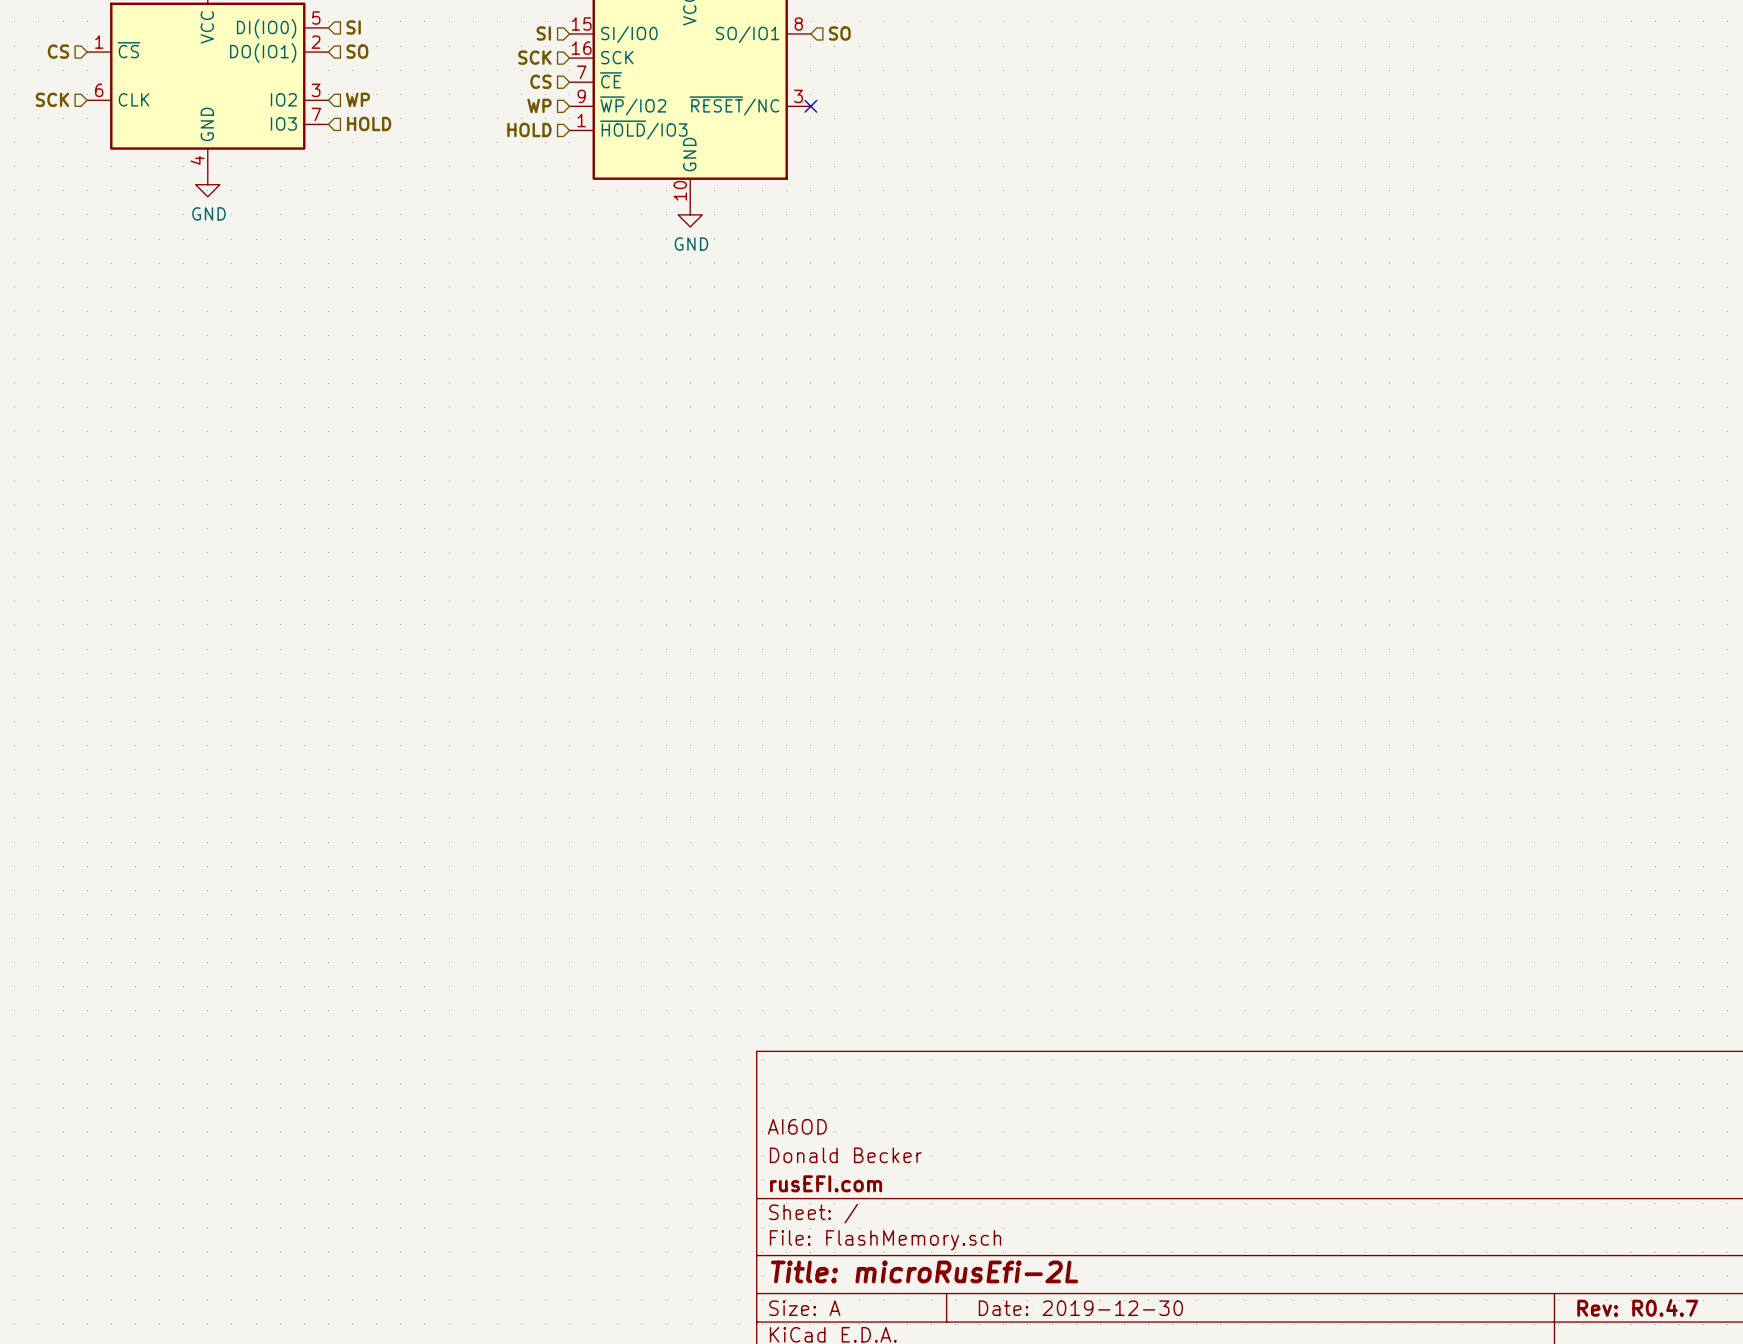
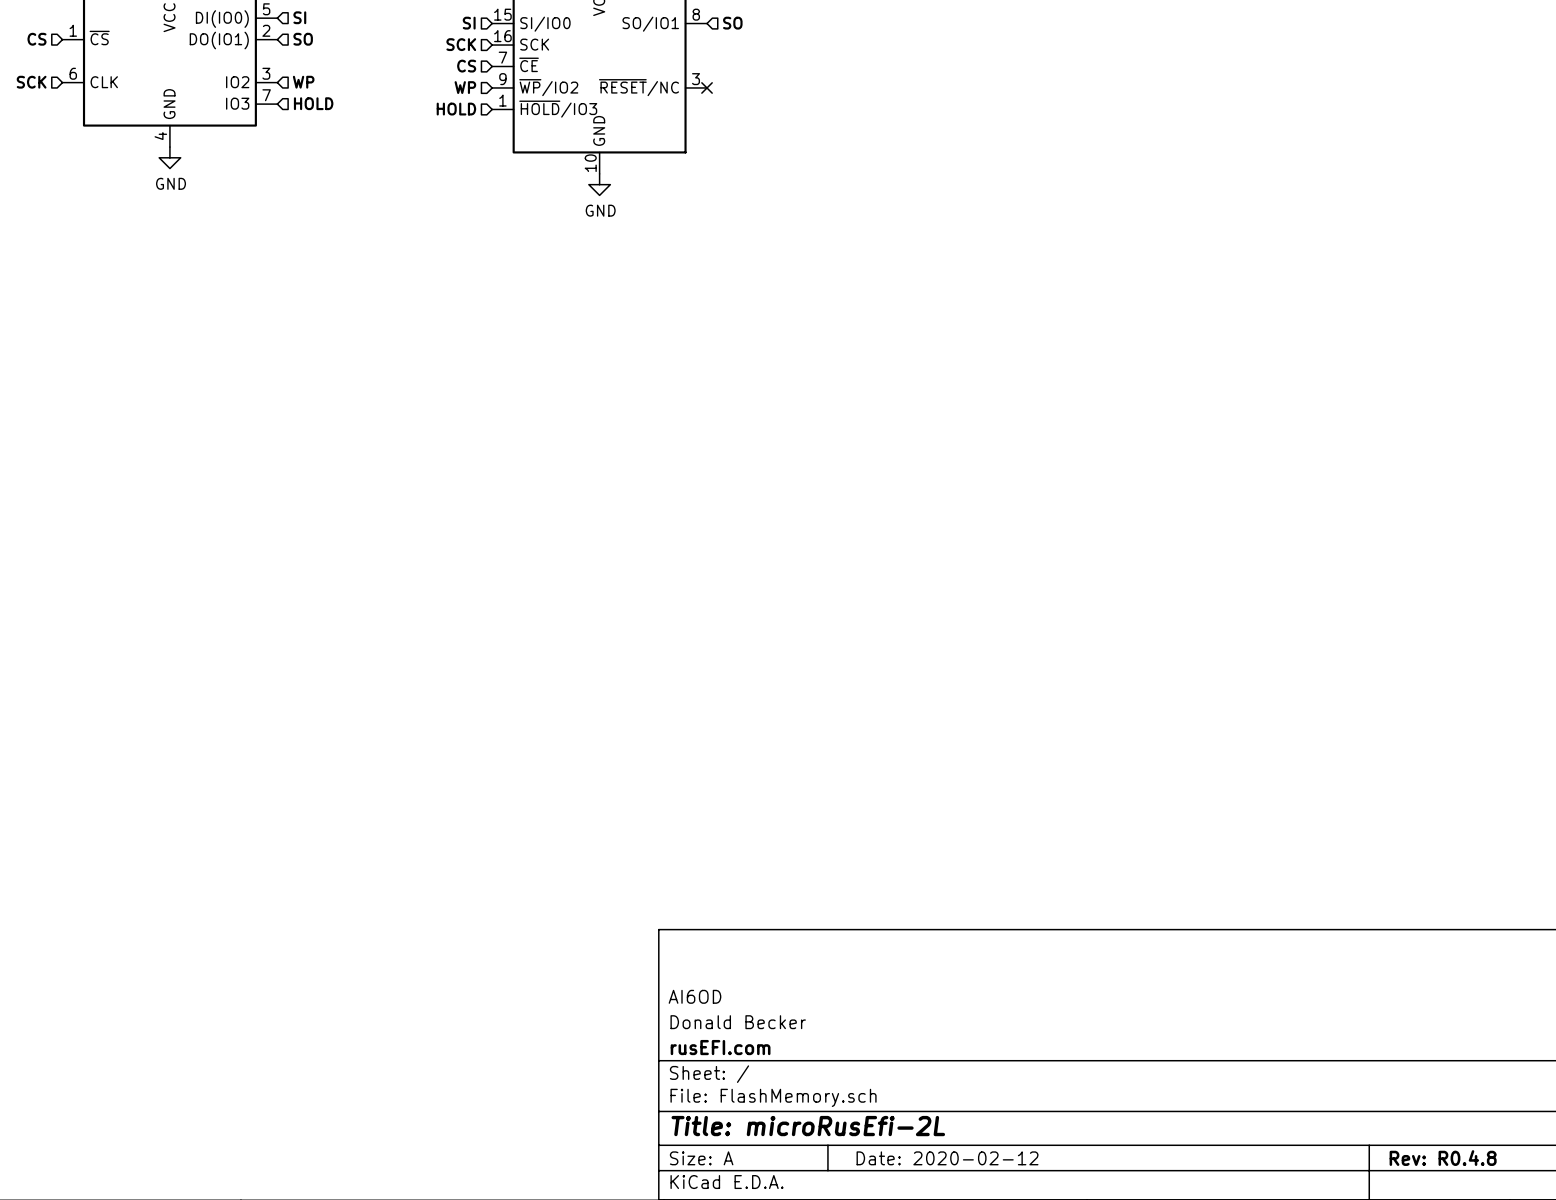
title block: Rev: R0.4.7 (1637, 1307) -> Rev: R0.4.8 (1443, 1158)
title block: Date: 2019-12-30 (1080, 1308) -> Date: 2020-02-12 (947, 1158)

